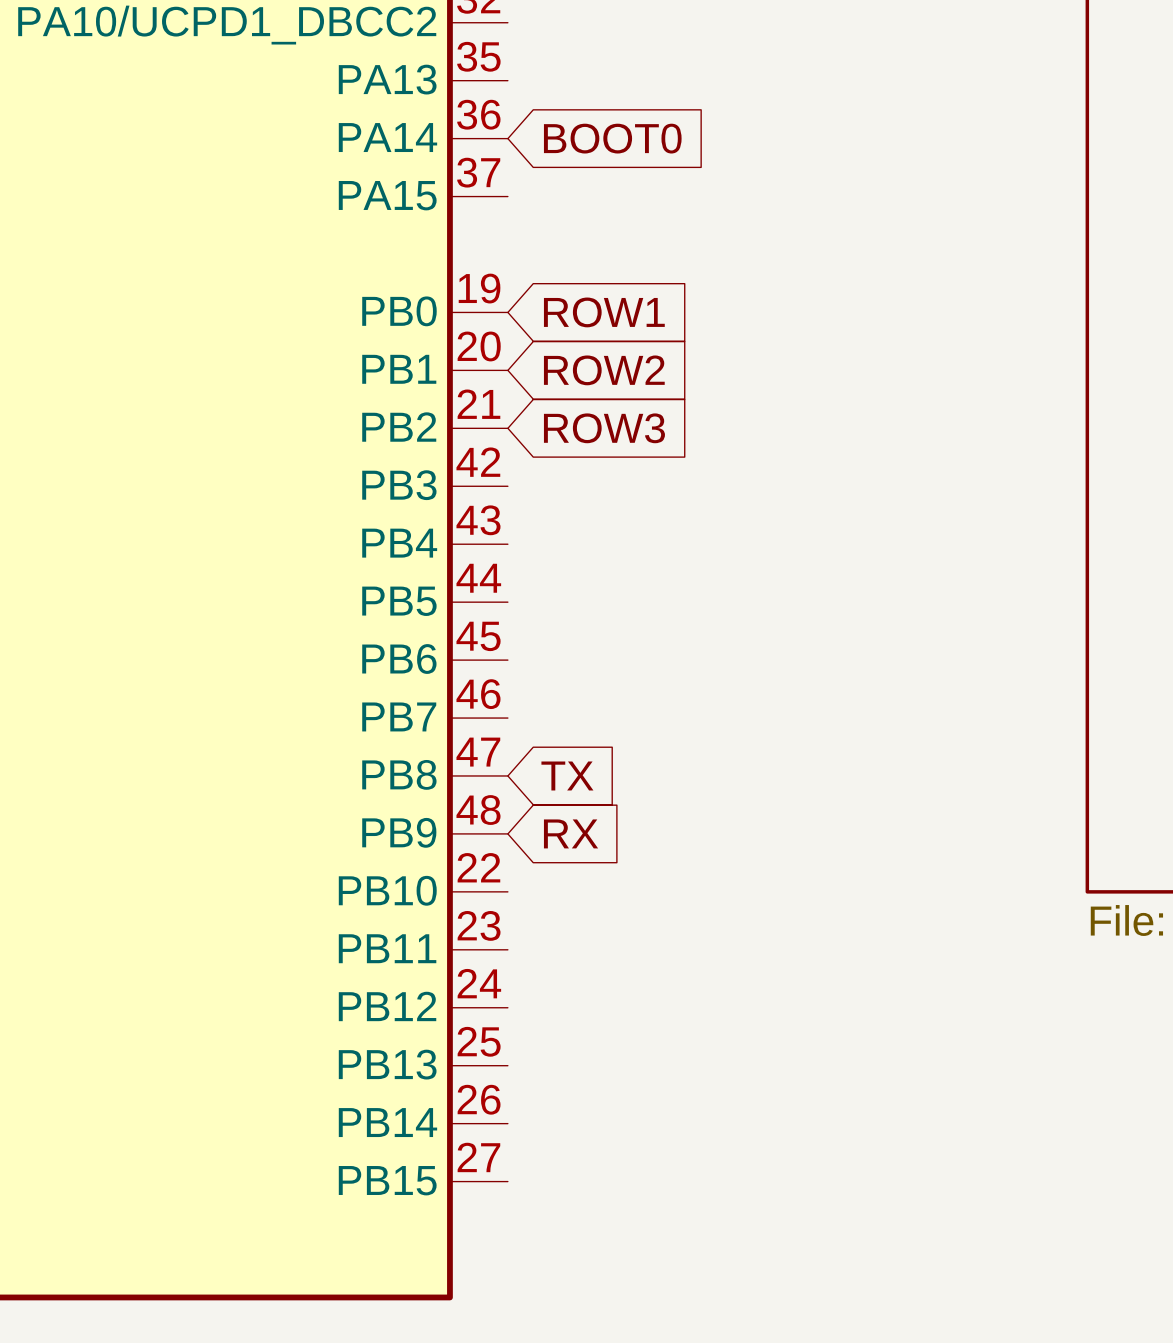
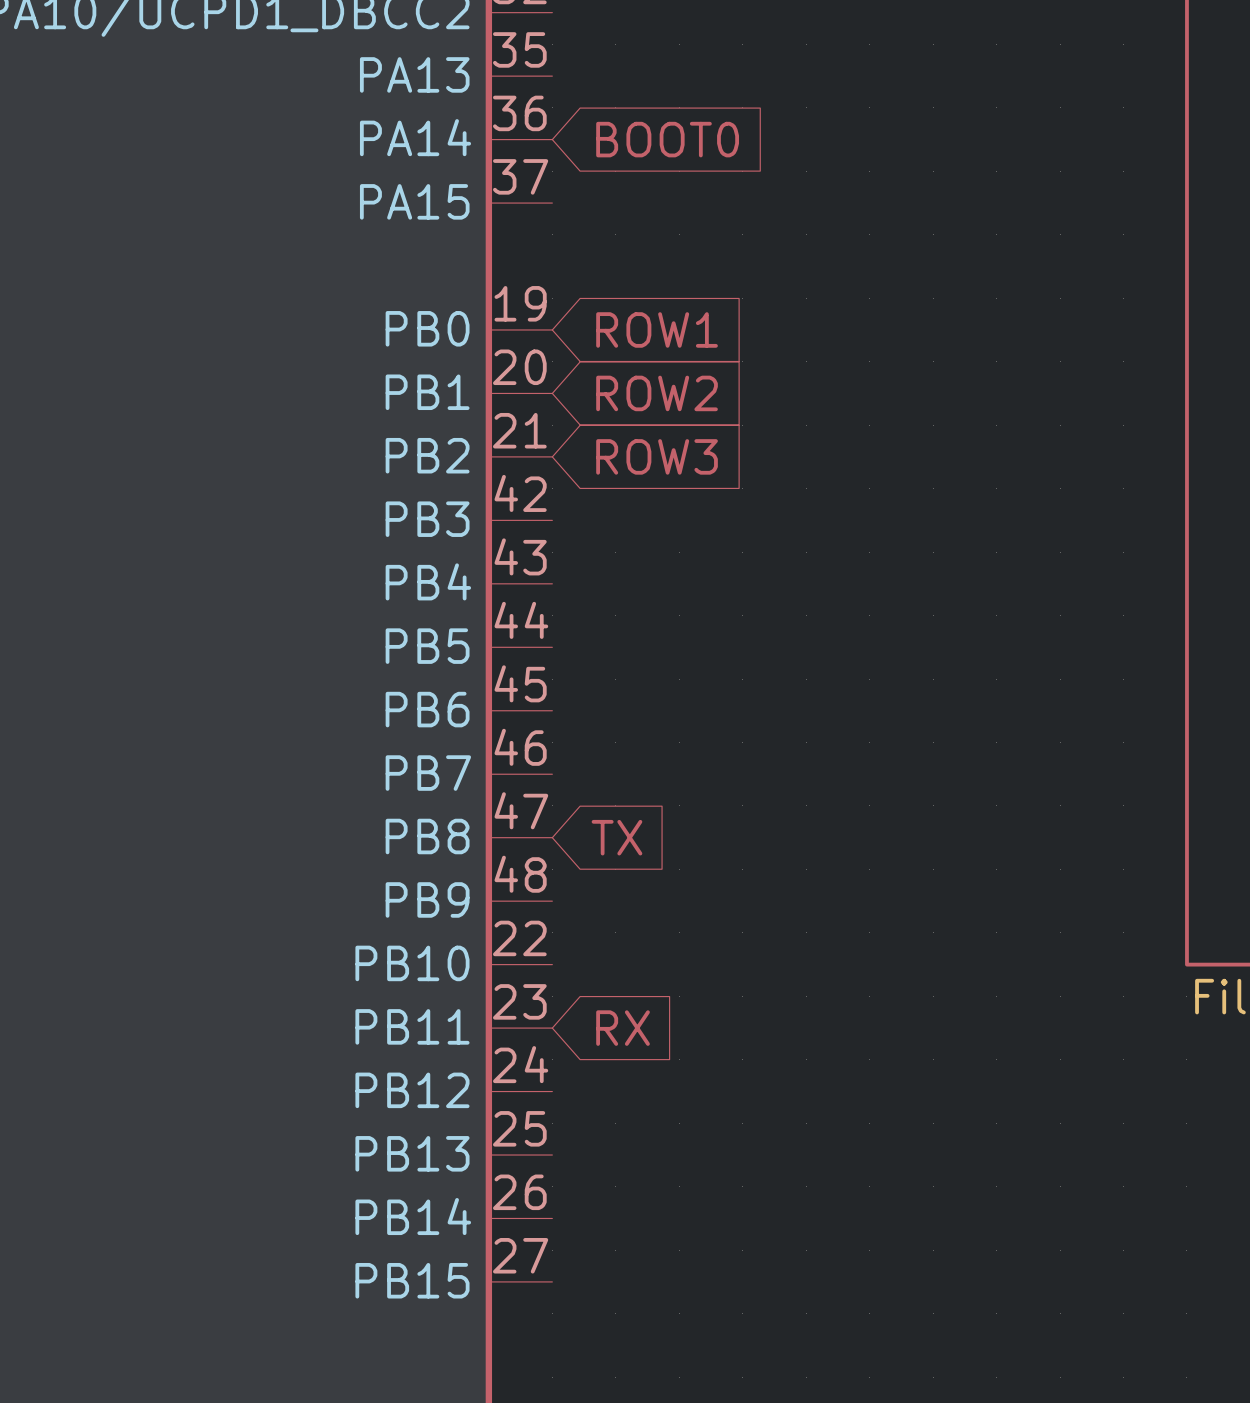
global label position: RX (571, 833) -> RX (623, 1028)

